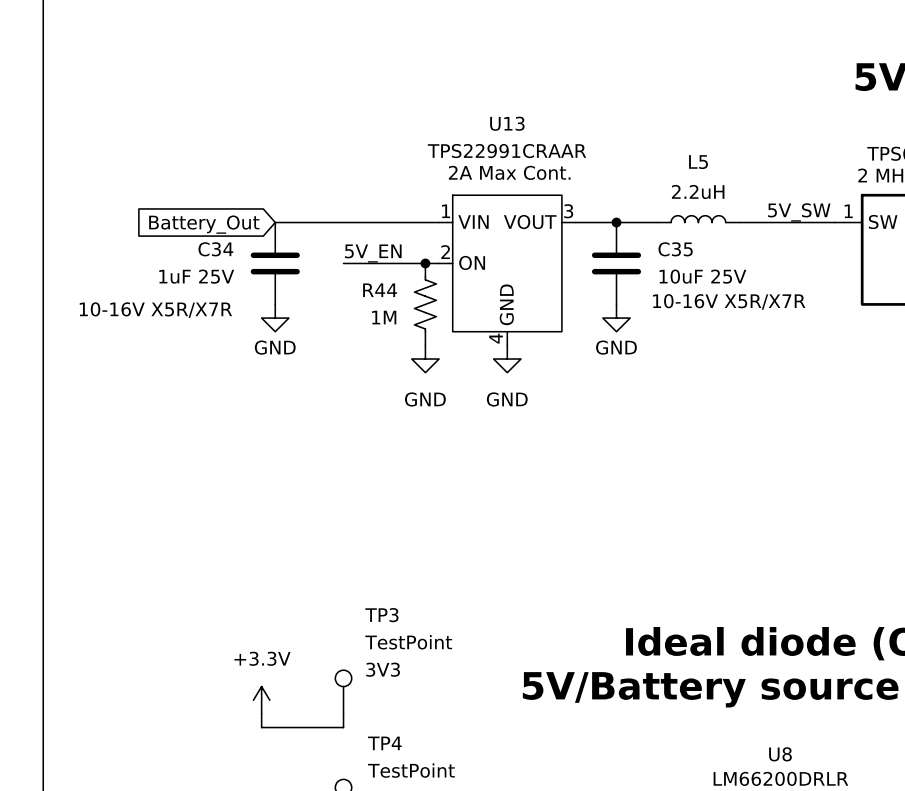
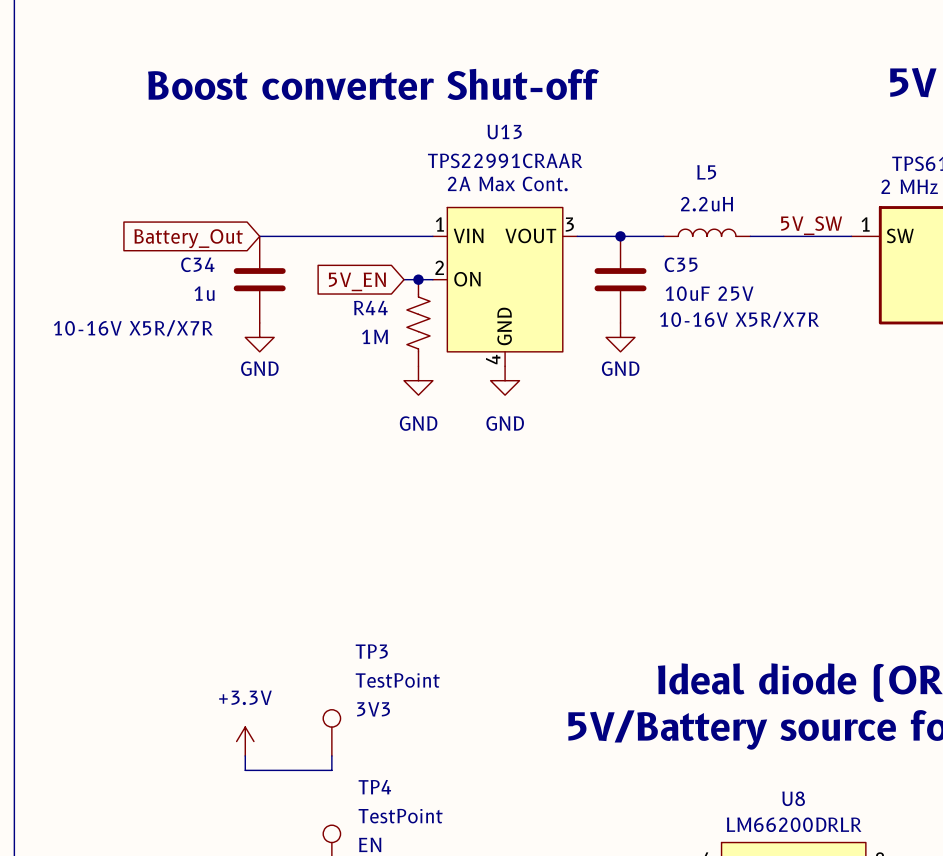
text: none -> Boost converter Shut-off (373, 84)
label: 5V_EN (373, 253) -> none
wire: (343, 263) (411, 263) -> none
global label: none -> 5V_EN (357, 281)
C34 value: 1uF 25V (196, 276) -> 1u (204, 293)

